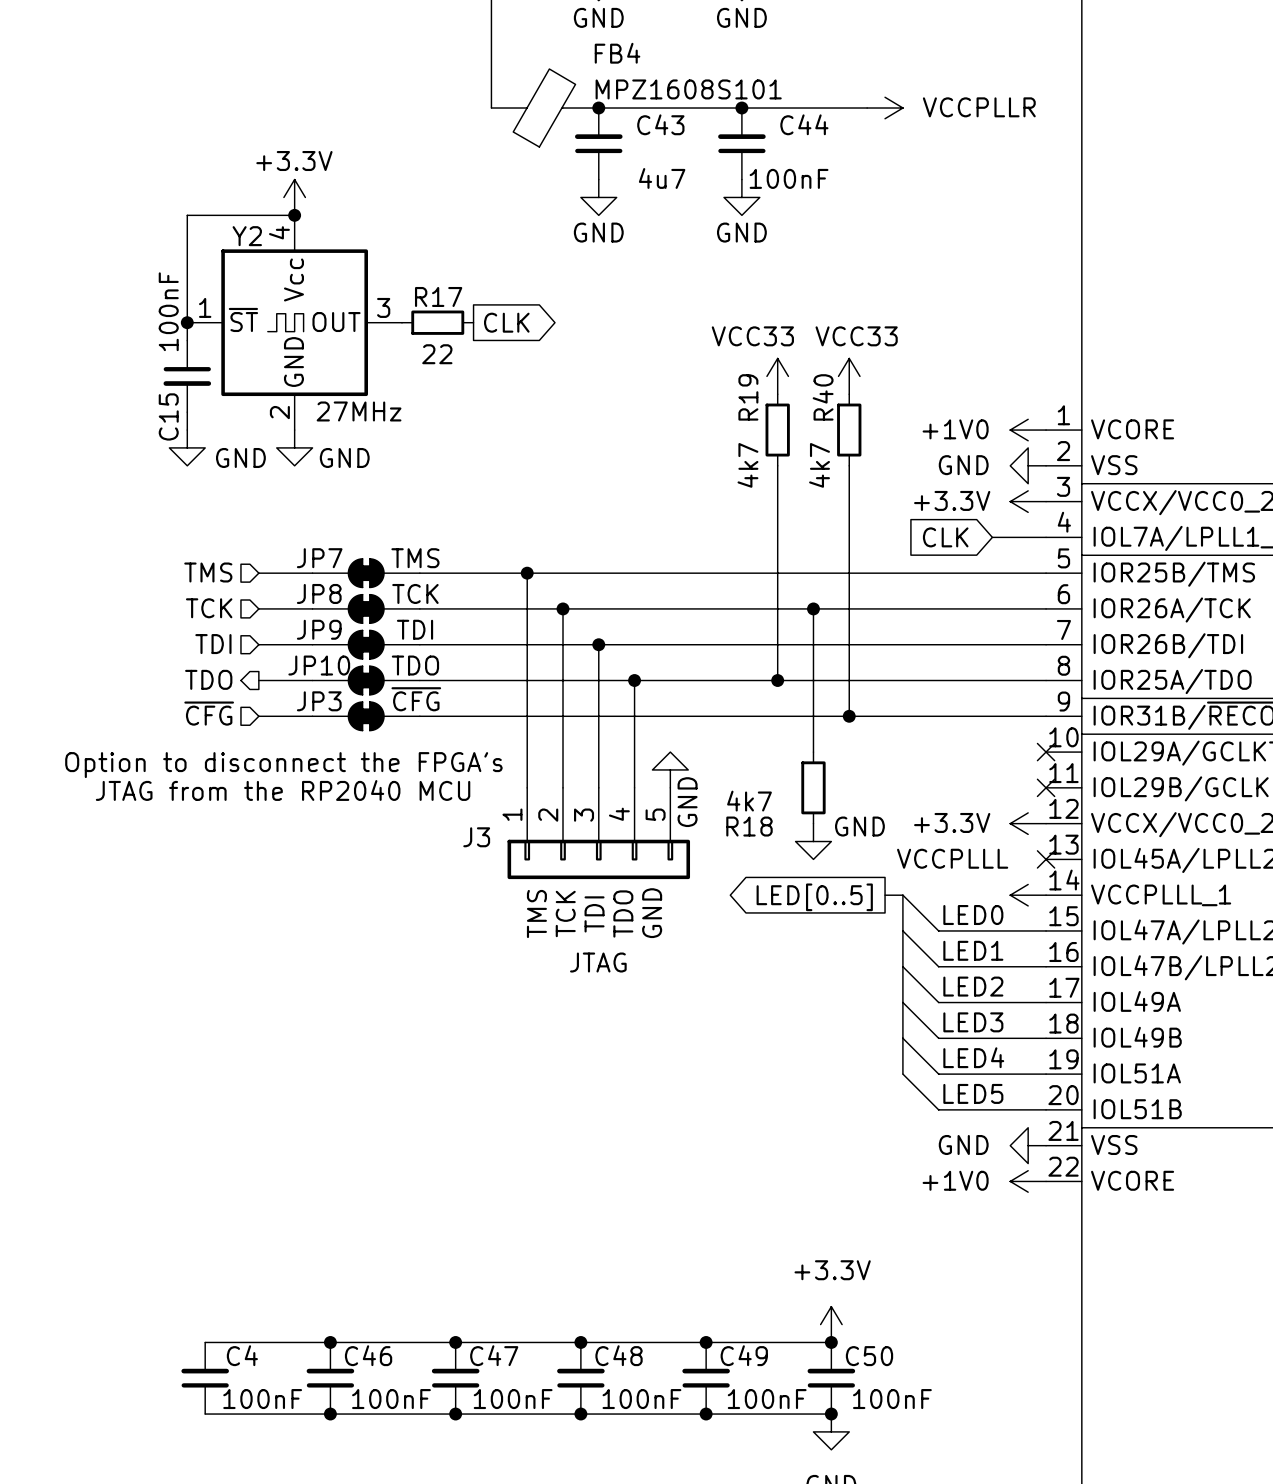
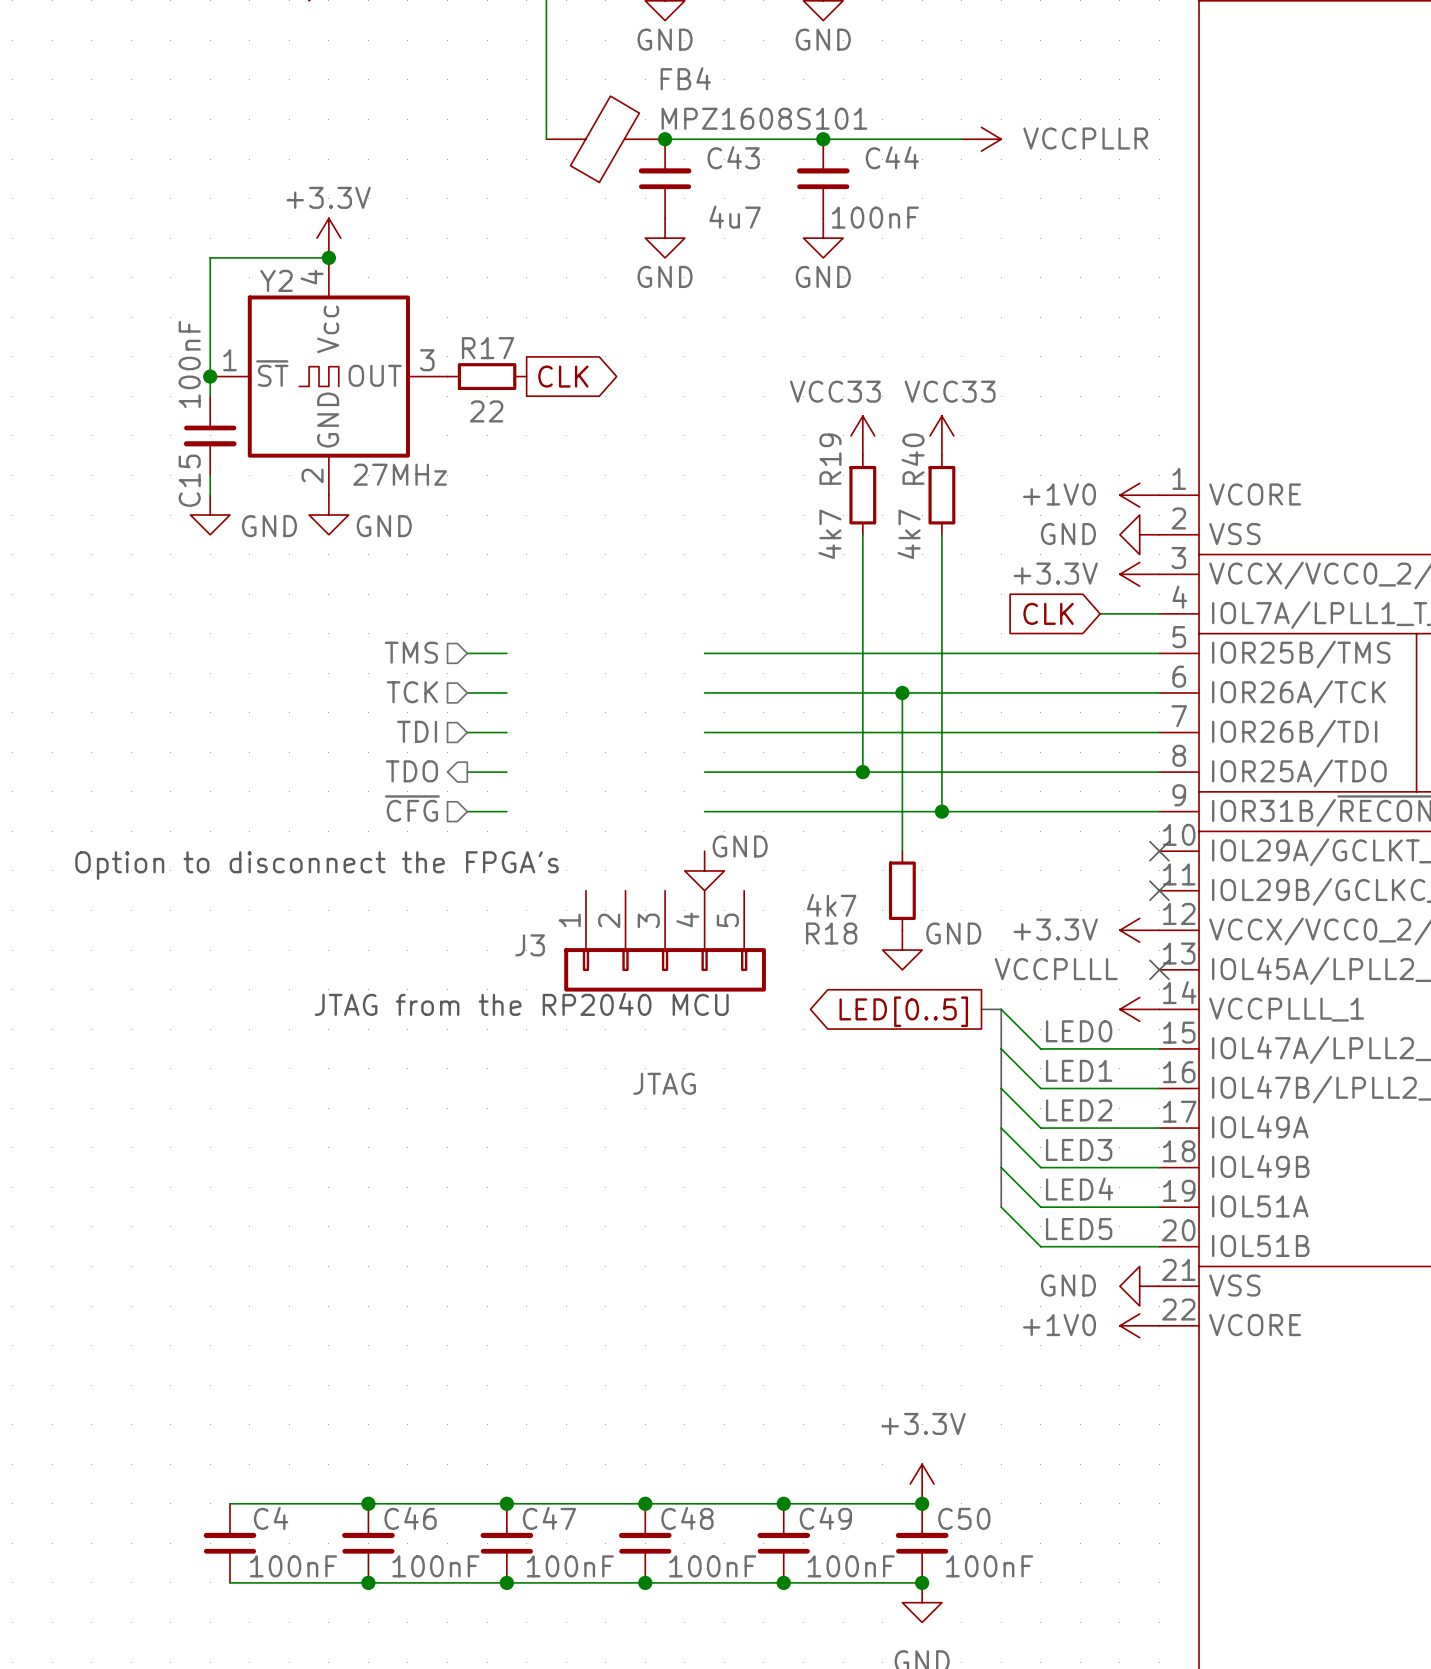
hierarchical label position: TMS (208, 572) -> TMS (411, 652)
wire: (258, 573) (312, 573) -> none
JP7: TMS (366, 573) -> none
wire: (455, 573) (634, 573) -> none
wire: (527, 573) (527, 787) -> none
junction: (527, 573) -> none
hierarchical label position: TCK (209, 608) -> TCK (412, 692)
wire: (258, 608) (312, 608) -> none
JP8: TCK (366, 608) -> none
wire: (455, 608) (634, 608) -> none
wire: (563, 608) (563, 787) -> none
junction: (563, 608) -> none
hierarchical label position: TDI (213, 644) -> TDI (417, 731)
wire: (258, 644) (312, 644) -> none
JP9: TDI (366, 644) -> none
wire: (455, 644) (634, 644) -> none
wire: (598, 644) (598, 787) -> none
junction: (598, 644) -> none
hierarchical label position: TDO (208, 679) -> TDO (411, 771)
wire: (258, 680) (312, 680) -> none
JP10: TDO (366, 680) -> none
wire: (455, 680) (634, 680) (634, 787) -> none
junction: (634, 680) -> none
hierarchical label position: ~{CFG} (209, 713) -> ~{CFG} (412, 808)
wire: (258, 716) (312, 716) -> none
JP3: ~{CFG} (366, 716) -> none
wire: (455, 716) (634, 716) -> none
power symbol rotation: 0° (670, 769) -> 180° (704, 870)
power symbol position: GND (670, 769) -> GND (704, 870)
text position: JTAG from the RP2040 MCU (283, 790) -> JTAG from the RP2040 MCU (521, 1004)
power symbol text position: GND (687, 802) -> GND (740, 846)
text: GND (652, 913) -> none
text: TMS (536, 914) -> none
text: TCK (565, 914) -> none
text: TDI (594, 914) -> none
text: TDO (623, 914) -> none

